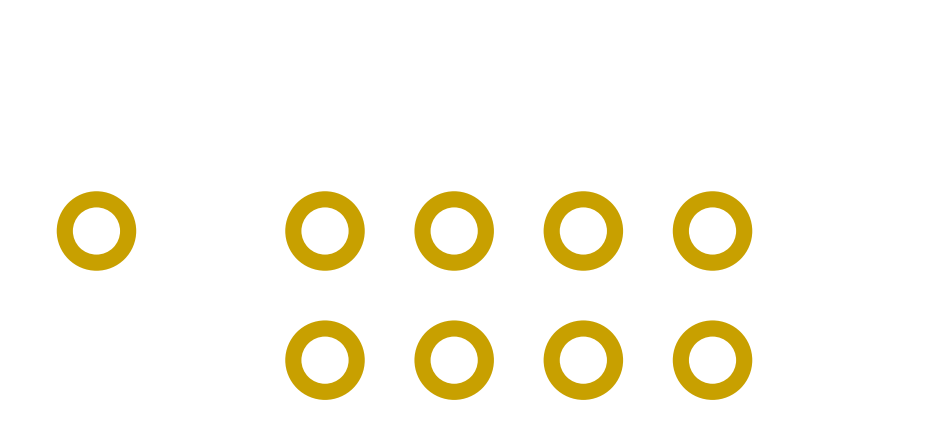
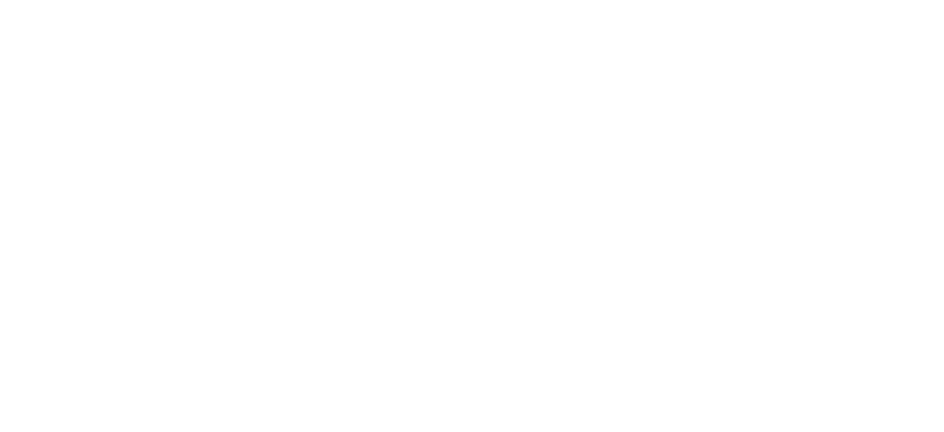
part: (96, 230) -> none
part: (325, 230) -> none
part: (454, 230) -> none
part: (583, 230) -> none
part: (712, 230) -> none
part: (325, 360) -> none
part: (454, 360) -> none
part: (583, 360) -> none
part: (712, 360) -> none

